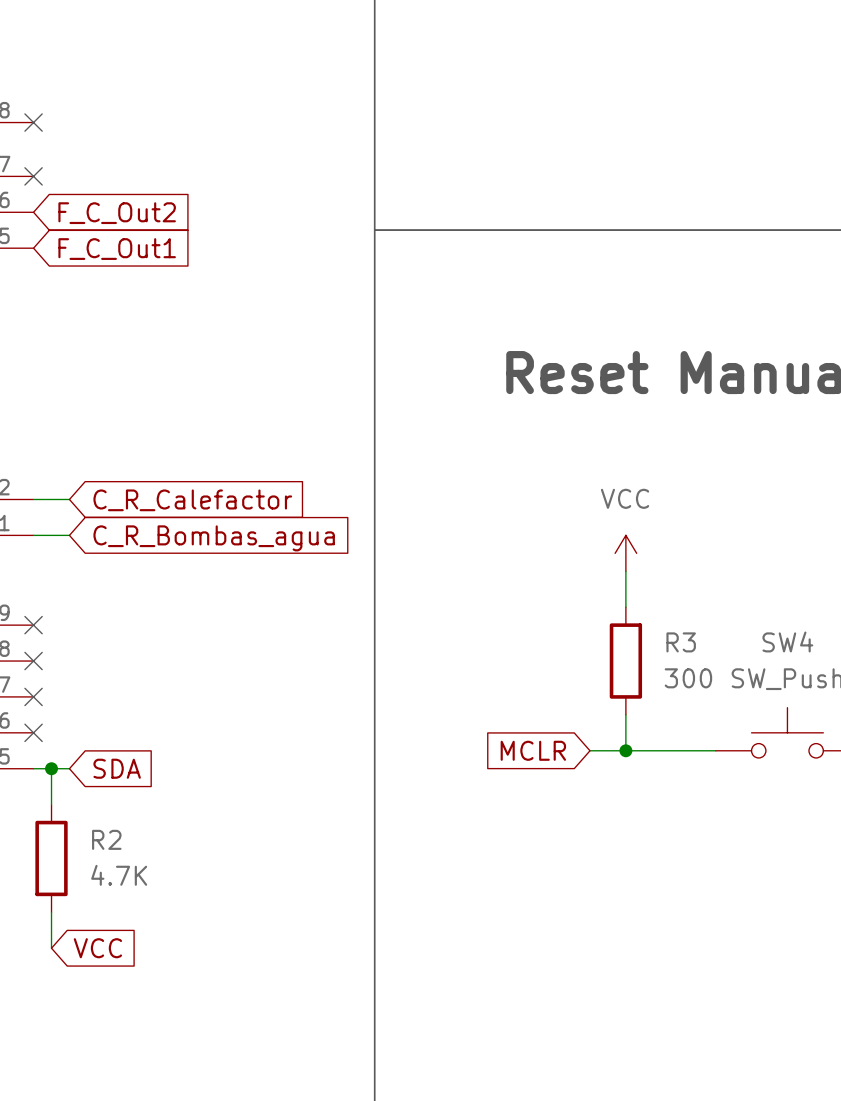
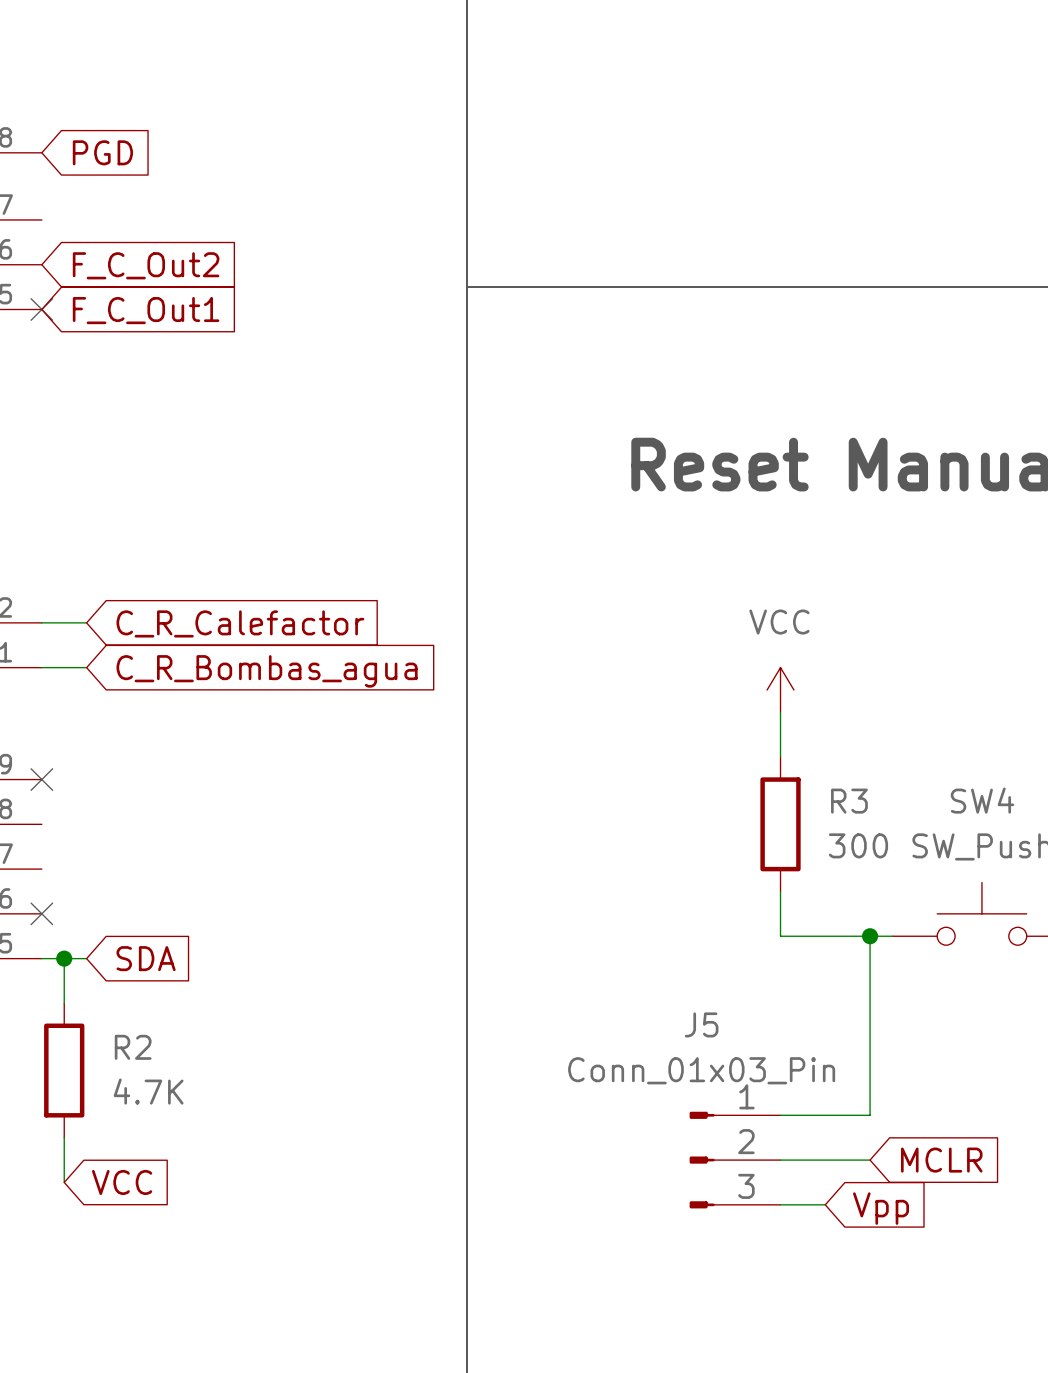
no-connect mark: (33, 122) -> none
global label: none -> PGD (102, 152)
no-connect mark: (33, 176) -> none
no-connect mark: none -> (41, 309)
no-connect mark: (33, 661) -> none
no-connect mark: (33, 696) -> none
global label rotation: 0° (533, 750) -> 180° (941, 1160)
global label position: MCLR (533, 750) -> MCLR (941, 1160)
wire: (590, 750) (625, 750) -> (780, 1204) (825, 1204)
junction position: (625, 750) -> (870, 936)
wire: none -> (870, 936) (870, 1115) (780, 1115)
J5: none -> Conn_01x03_Pin (735, 1160)
wire: none -> (780, 1160) (870, 1160)
global label: none -> Vpp (881, 1208)

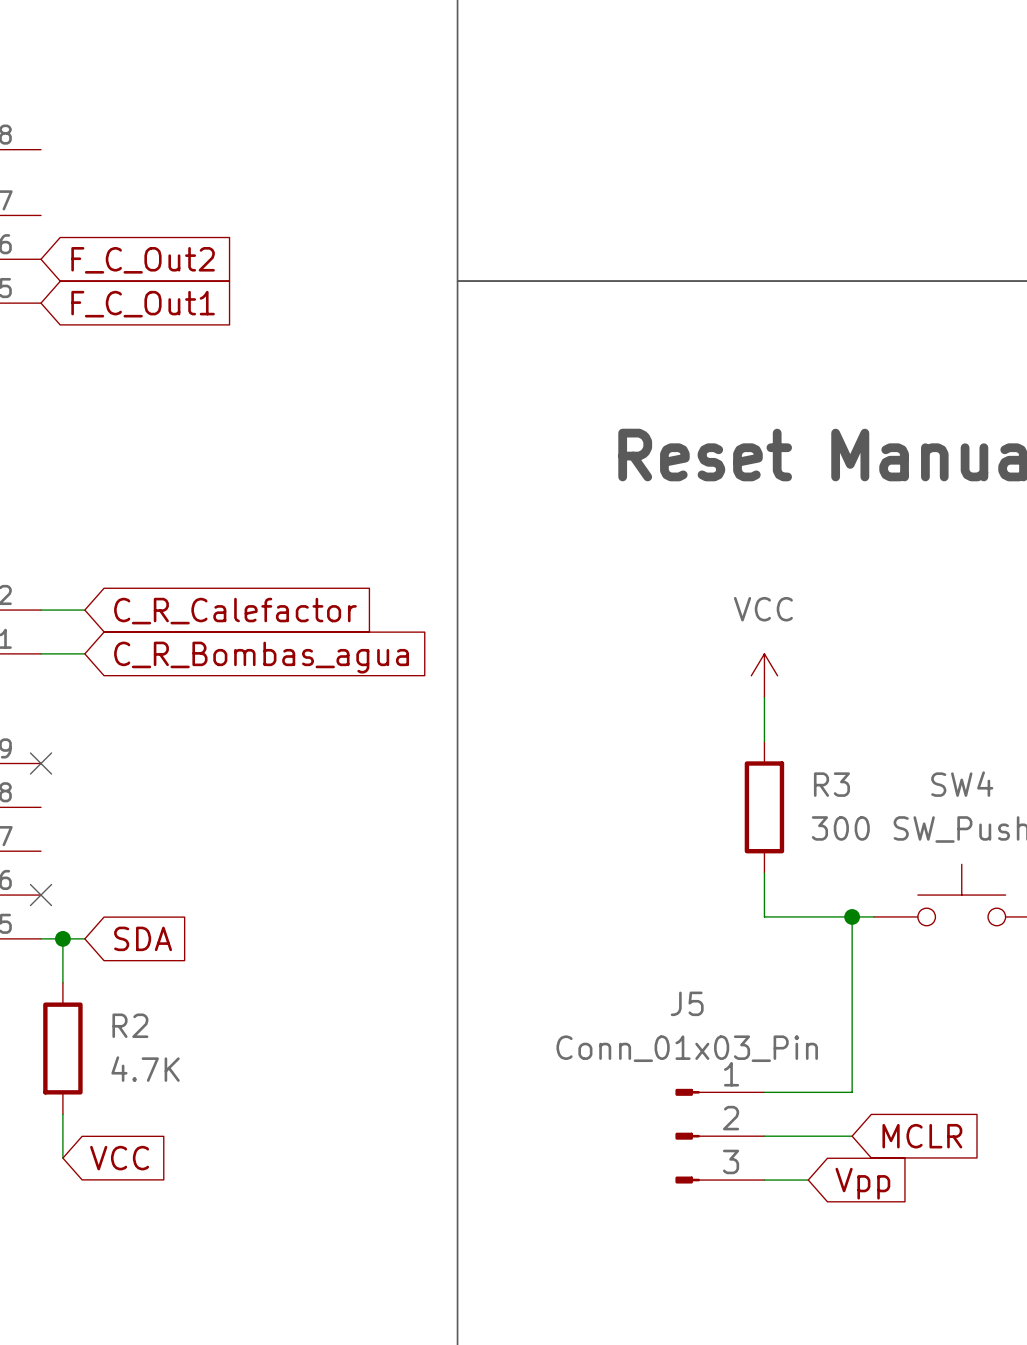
global label: PGD (102, 152) -> none
no-connect mark: (41, 309) -> none

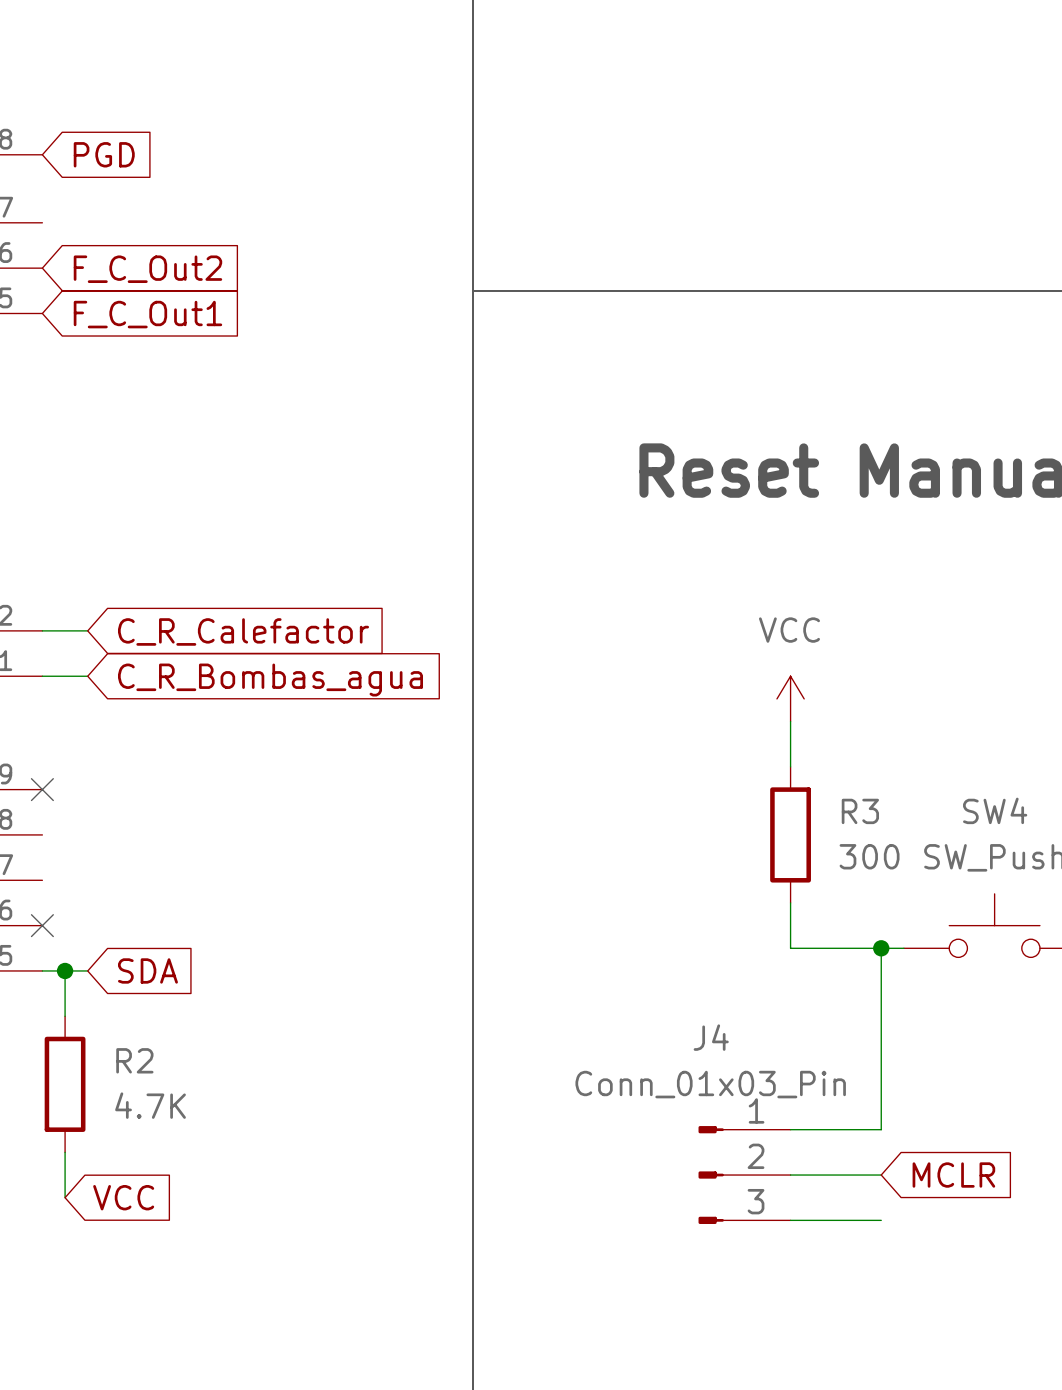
global label: none -> PGD (104, 154)
J5 name: J5 (687, 1003) -> J4 (711, 1037)
wire: none -> (835, 1220) (881, 1220)
global label: Vpp (862, 1183) -> none

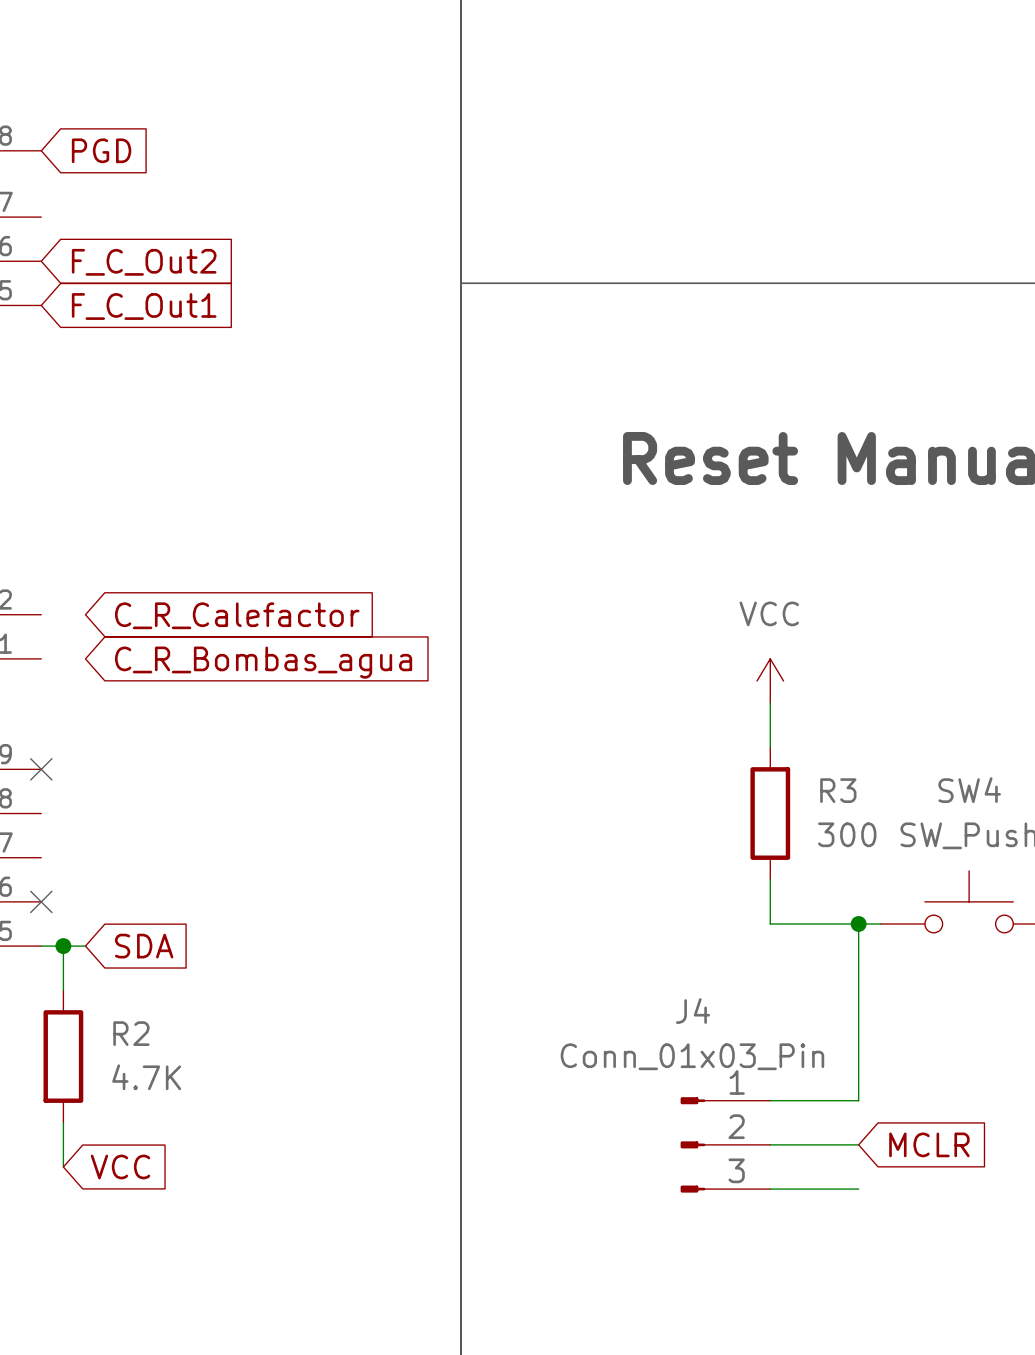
wire: (42, 630) (87, 630) -> none
wire: (42, 676) (87, 676) -> none

